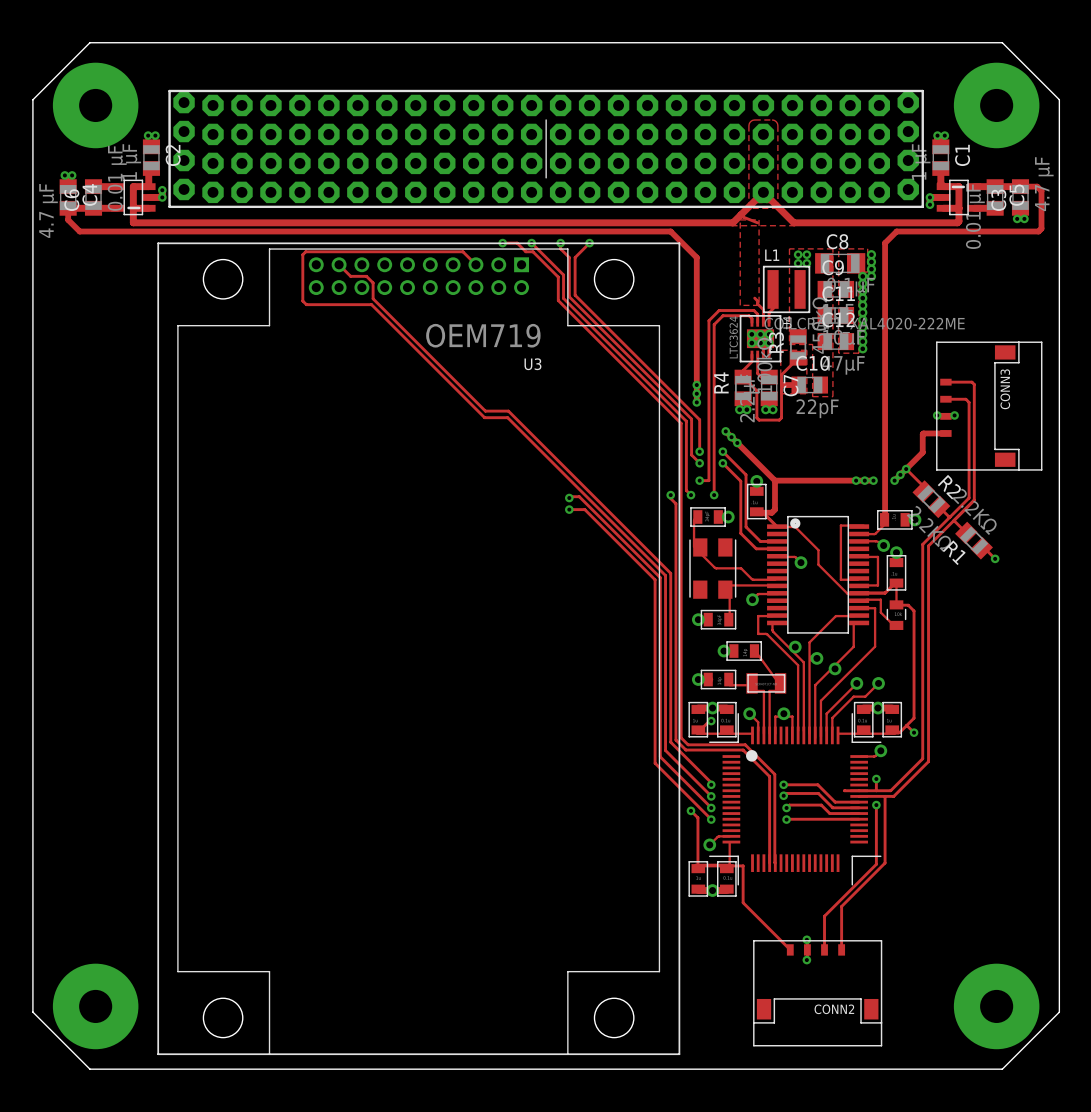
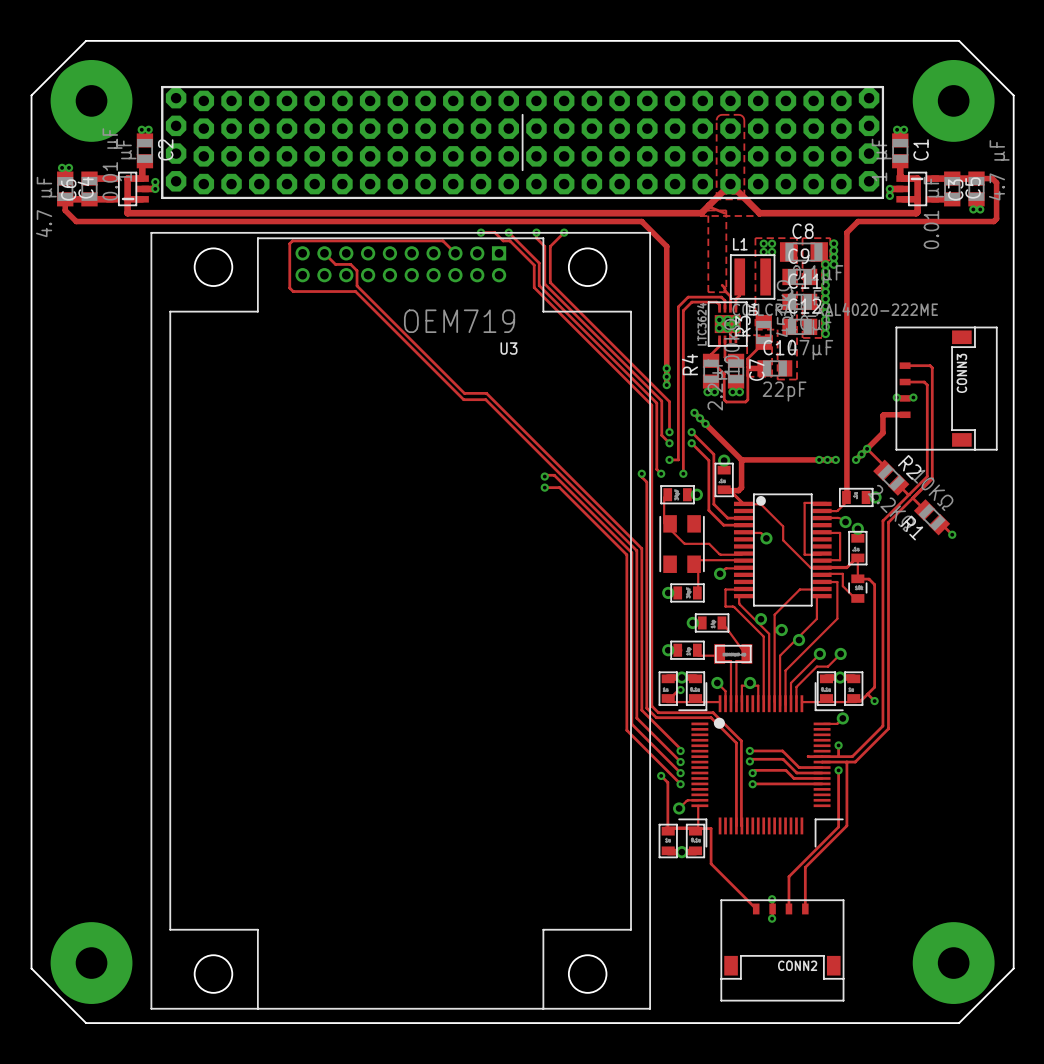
R1 value: 2.2KΩ (974, 511) -> 10KΩ (932, 490)

